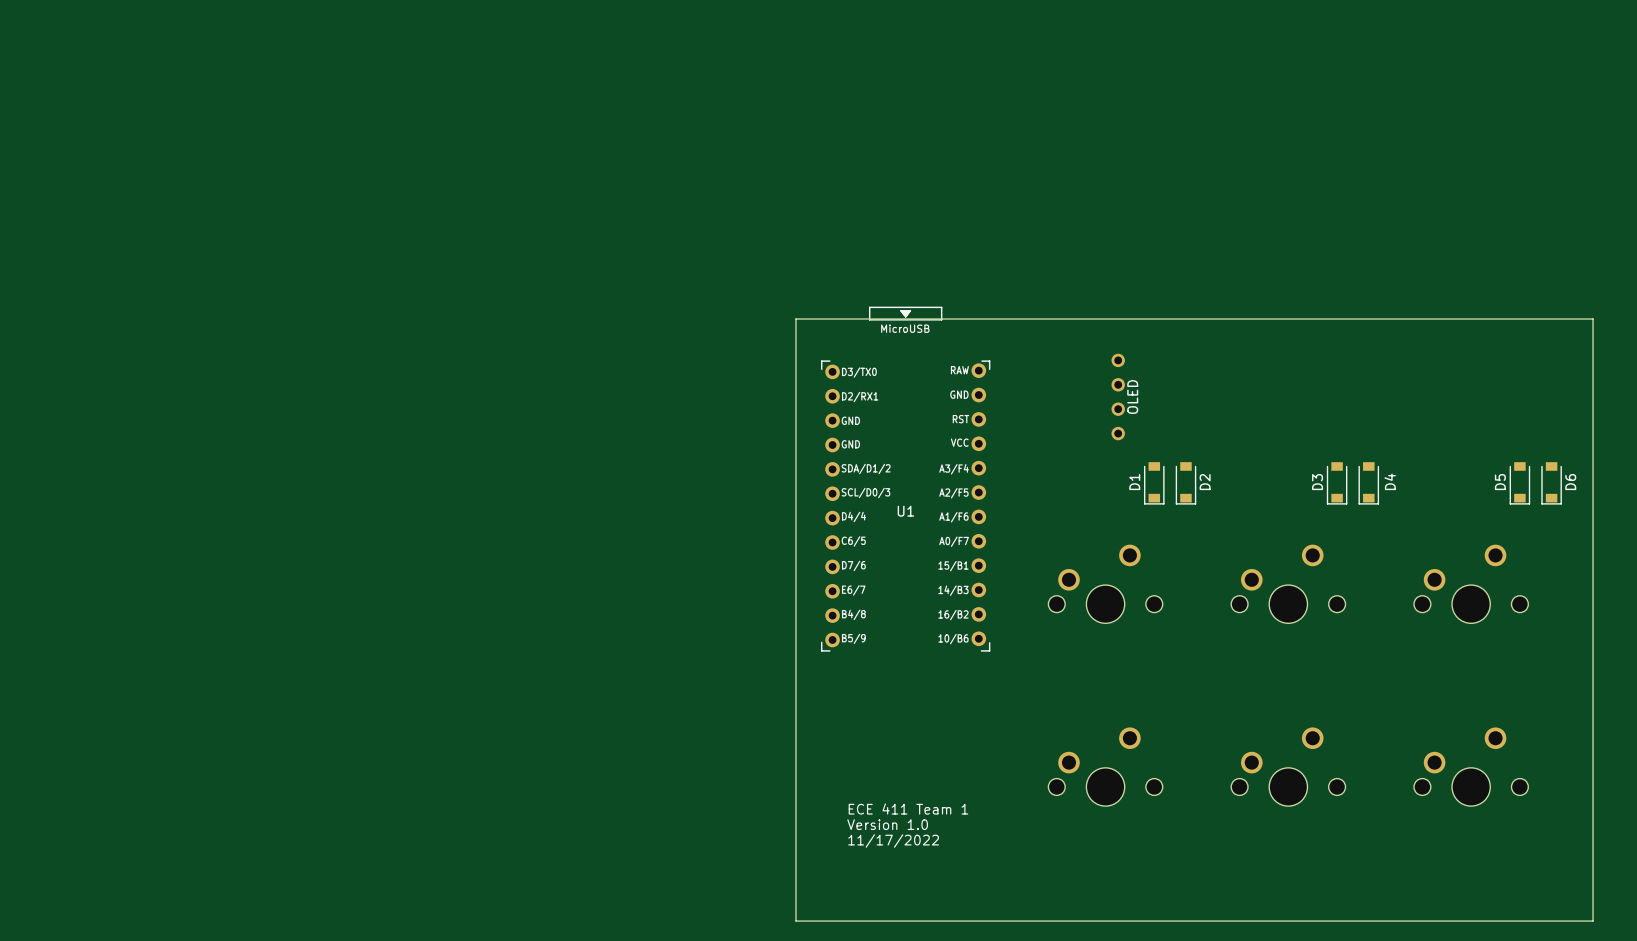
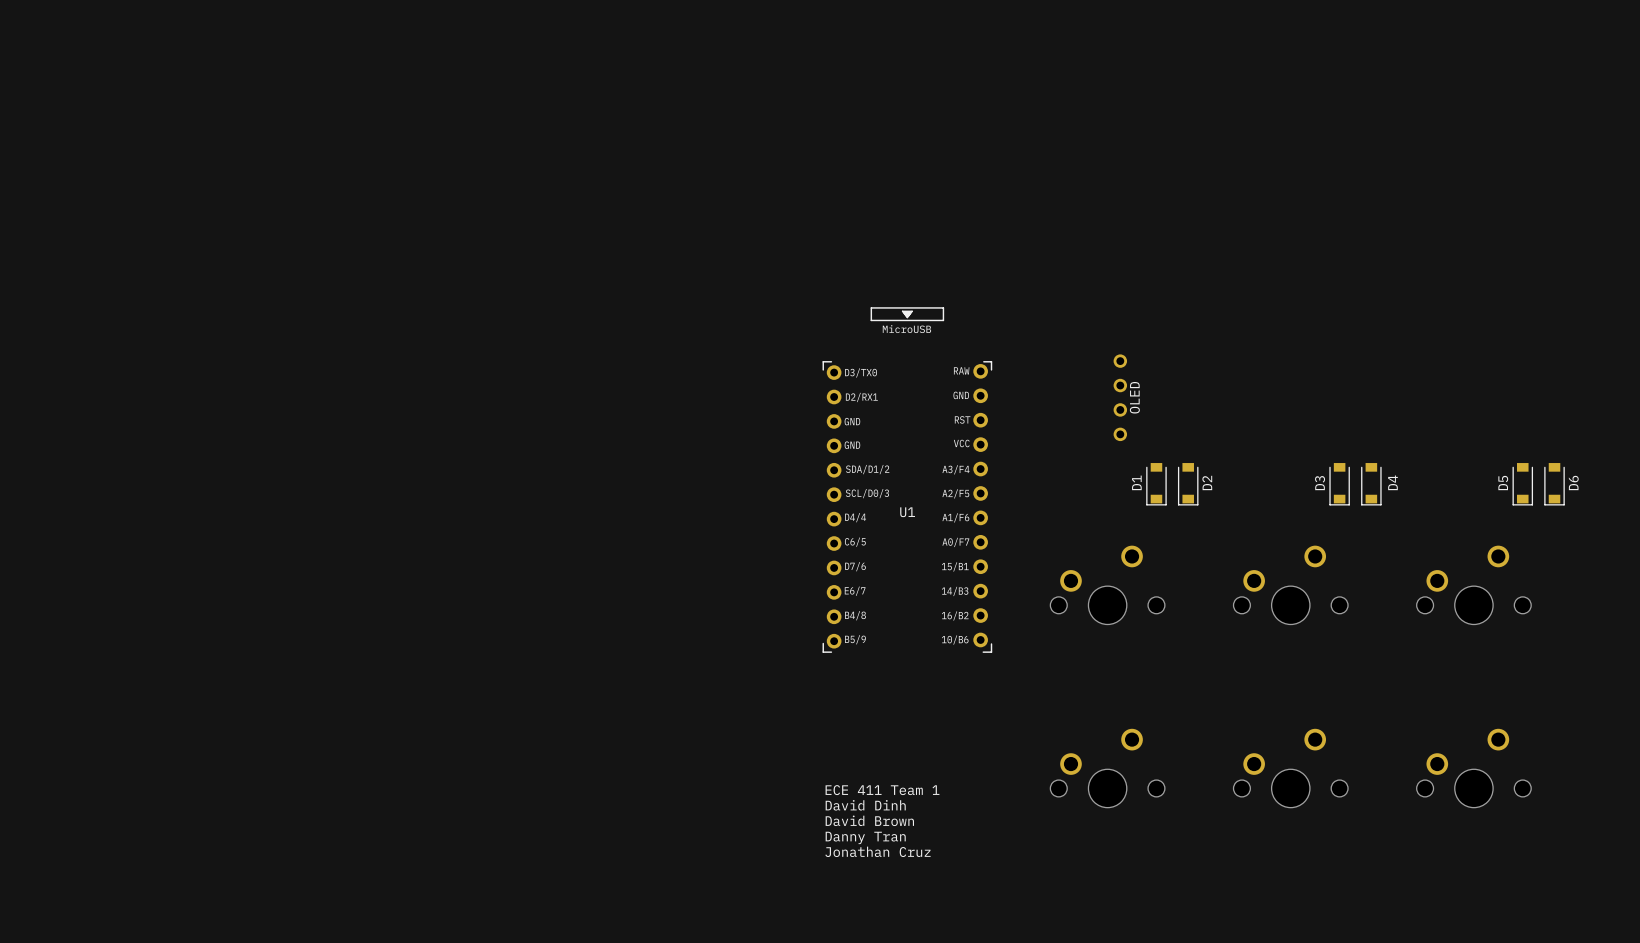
board edge: (795, 318) (1593, 318) (1593, 921) (795, 921) (795, 318) -> none
text: none -> David Dinh (865, 805)
text position: ECE 411 Team 1 (908, 808) -> ECE 411 Team 1 (882, 790)
text: none -> David Brown (869, 820)
text: Version 1.0 (887, 824) -> none
text: none -> Danny Tran (865, 837)
text: 11/17/2022 (893, 841) -> none
text: none -> Jonathan Cruz (877, 851)

